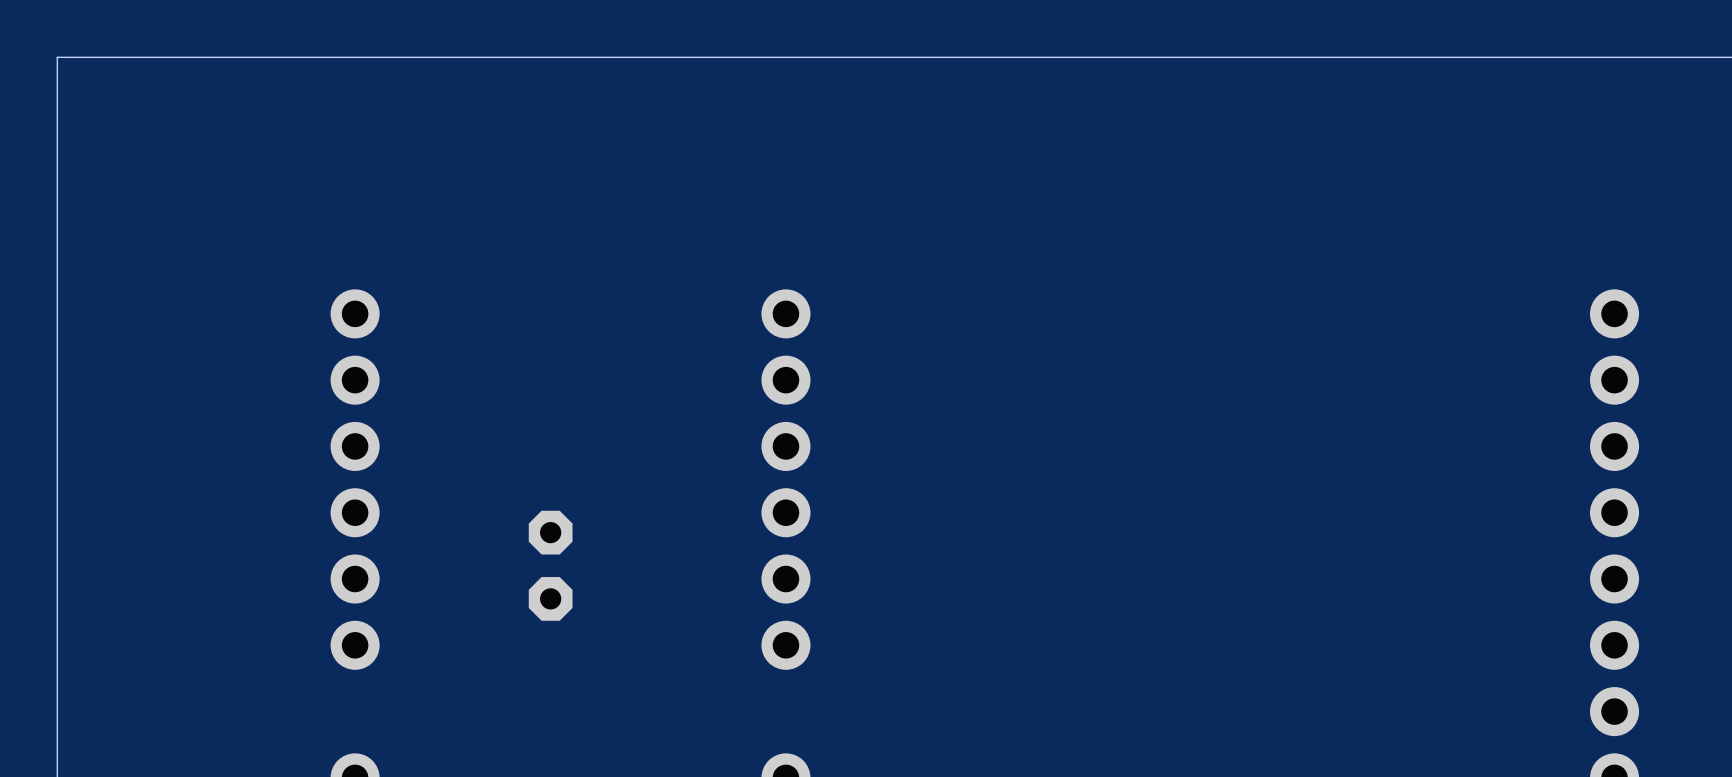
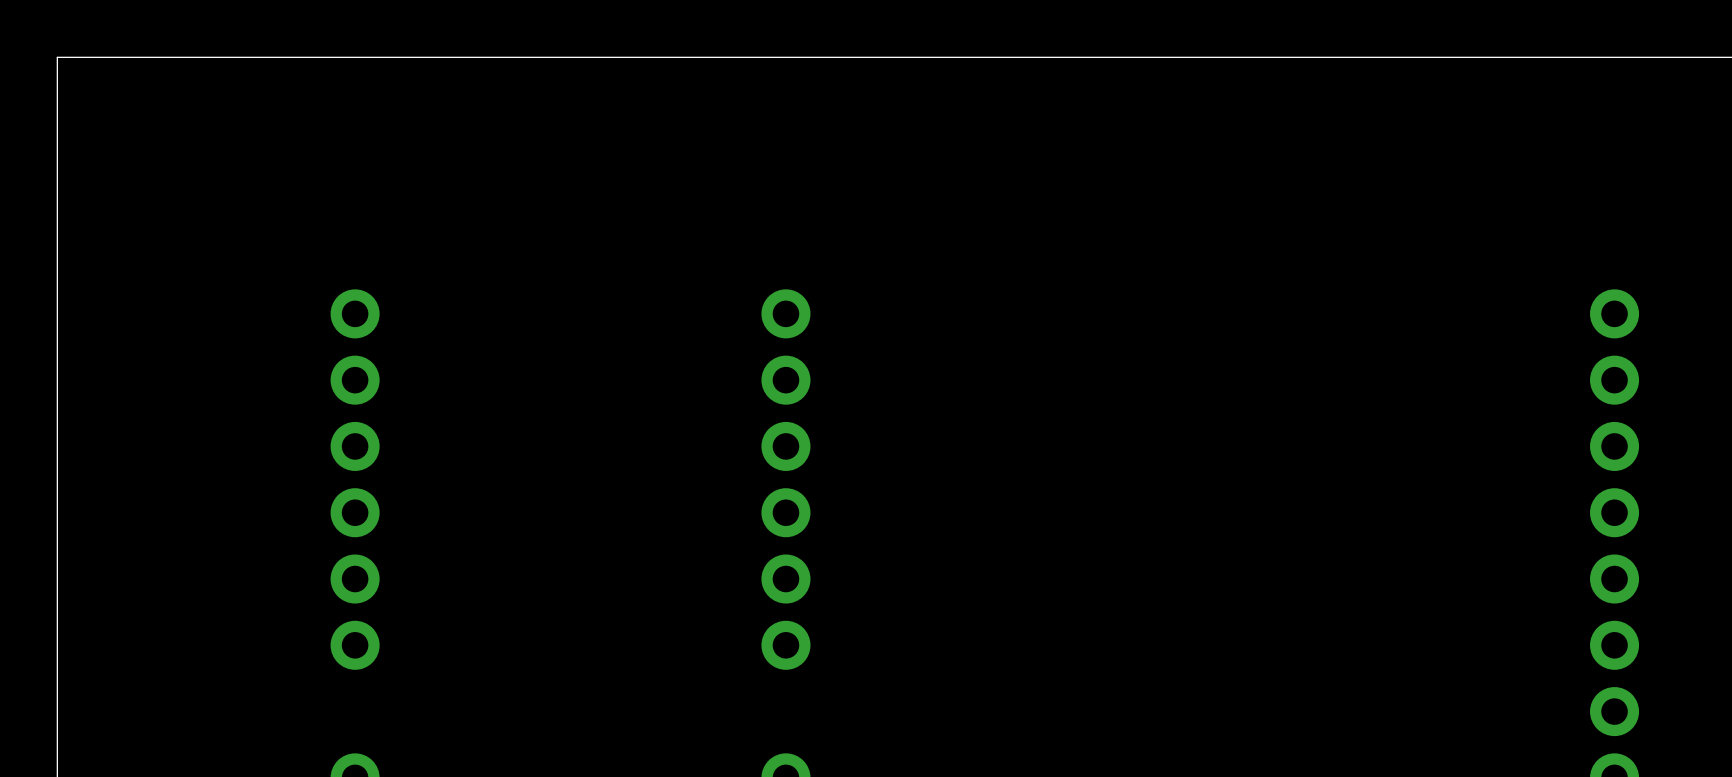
part: (550, 565) -> none

